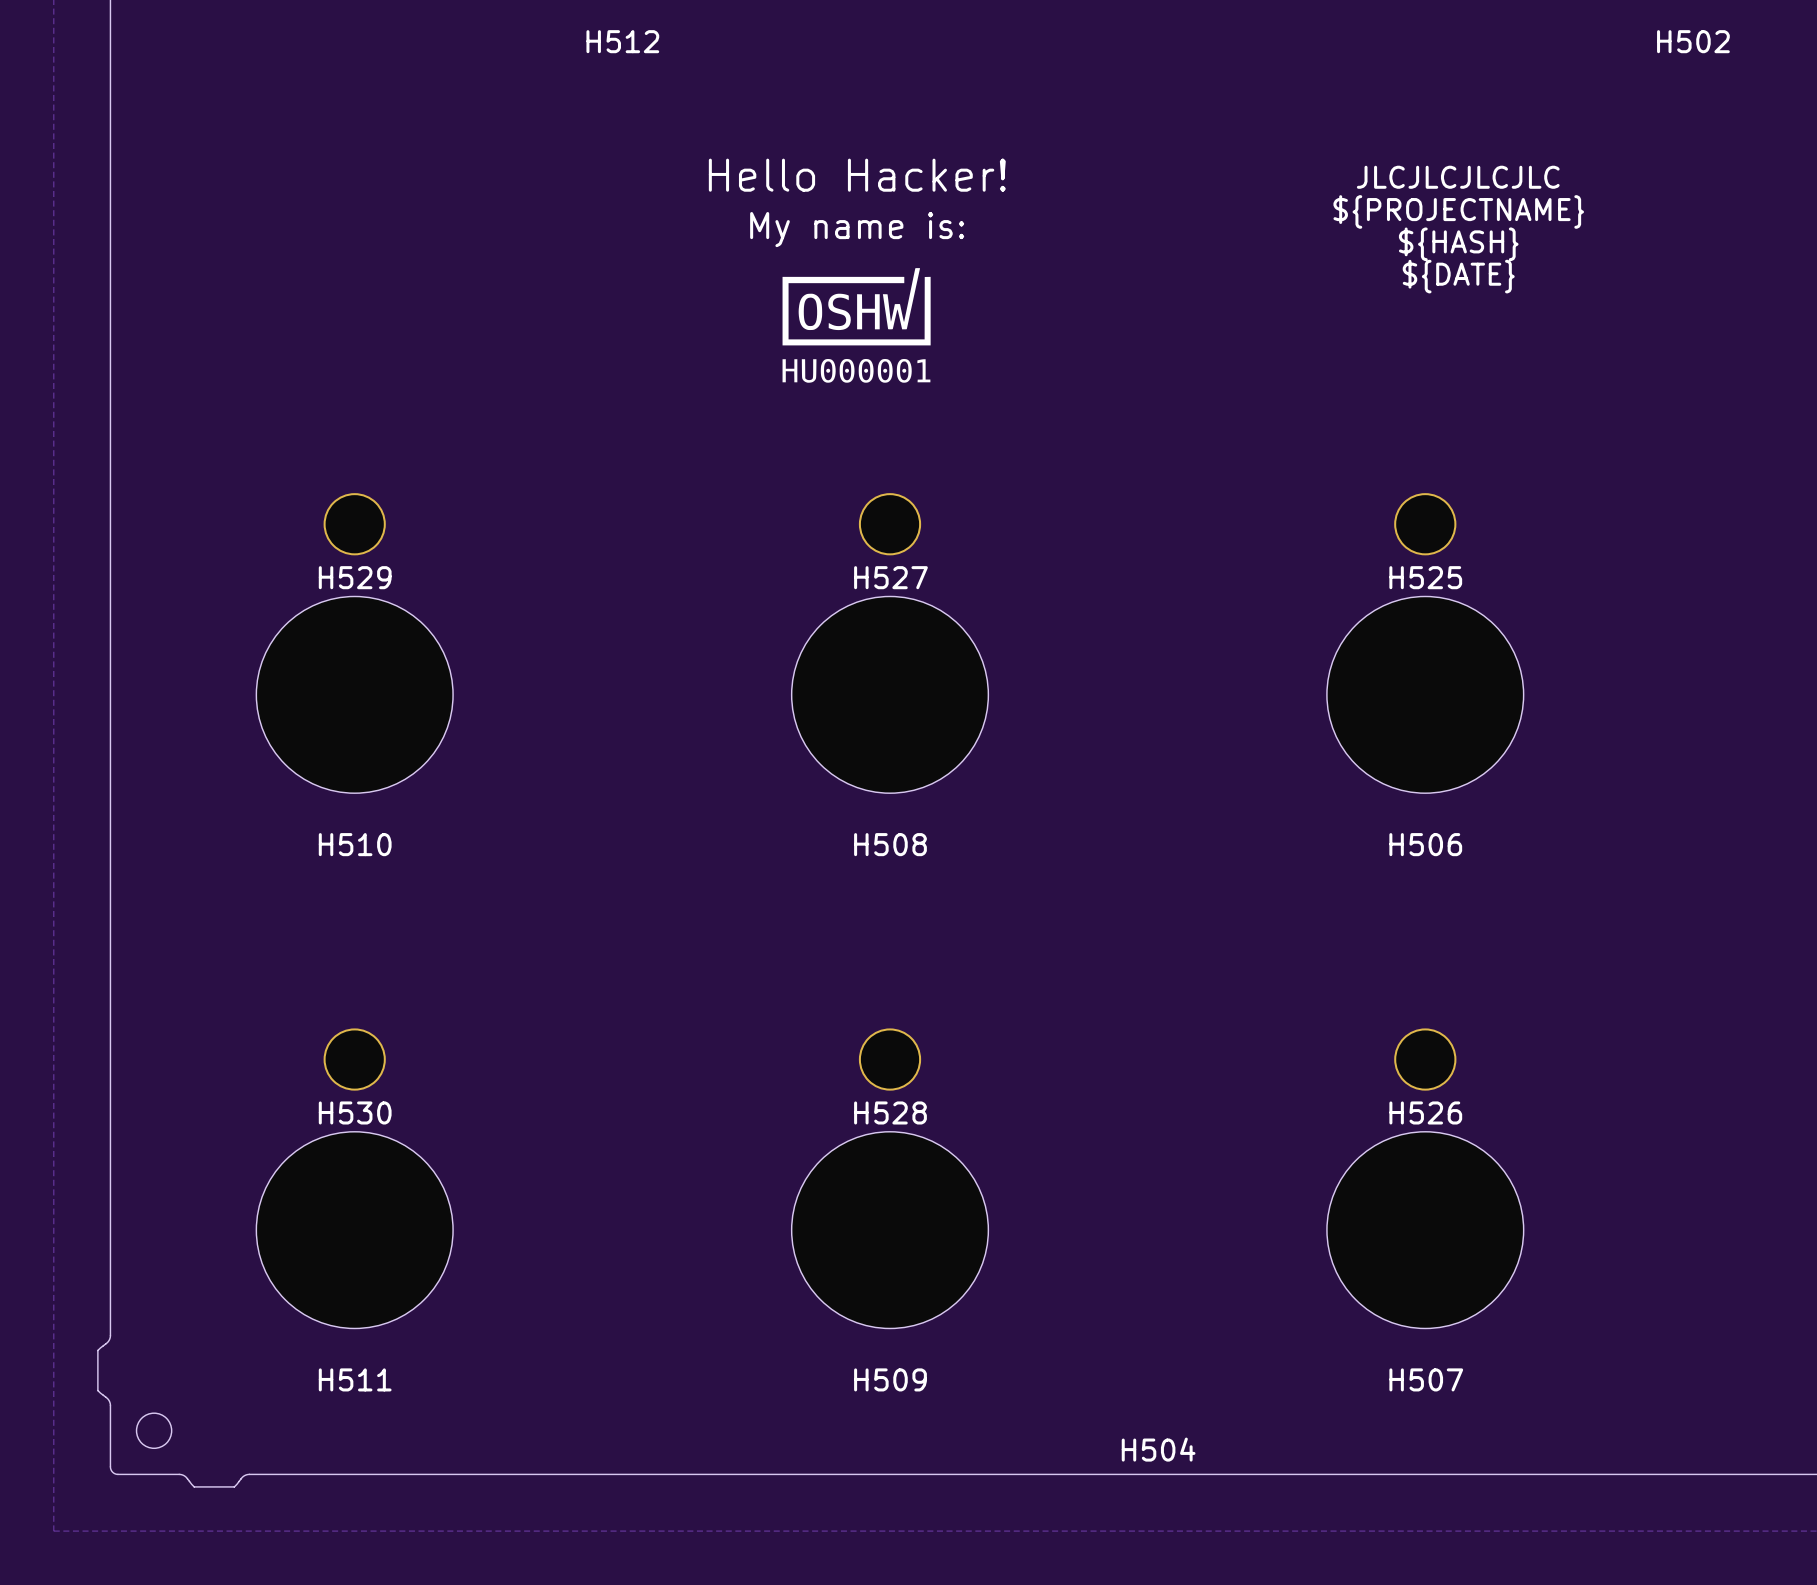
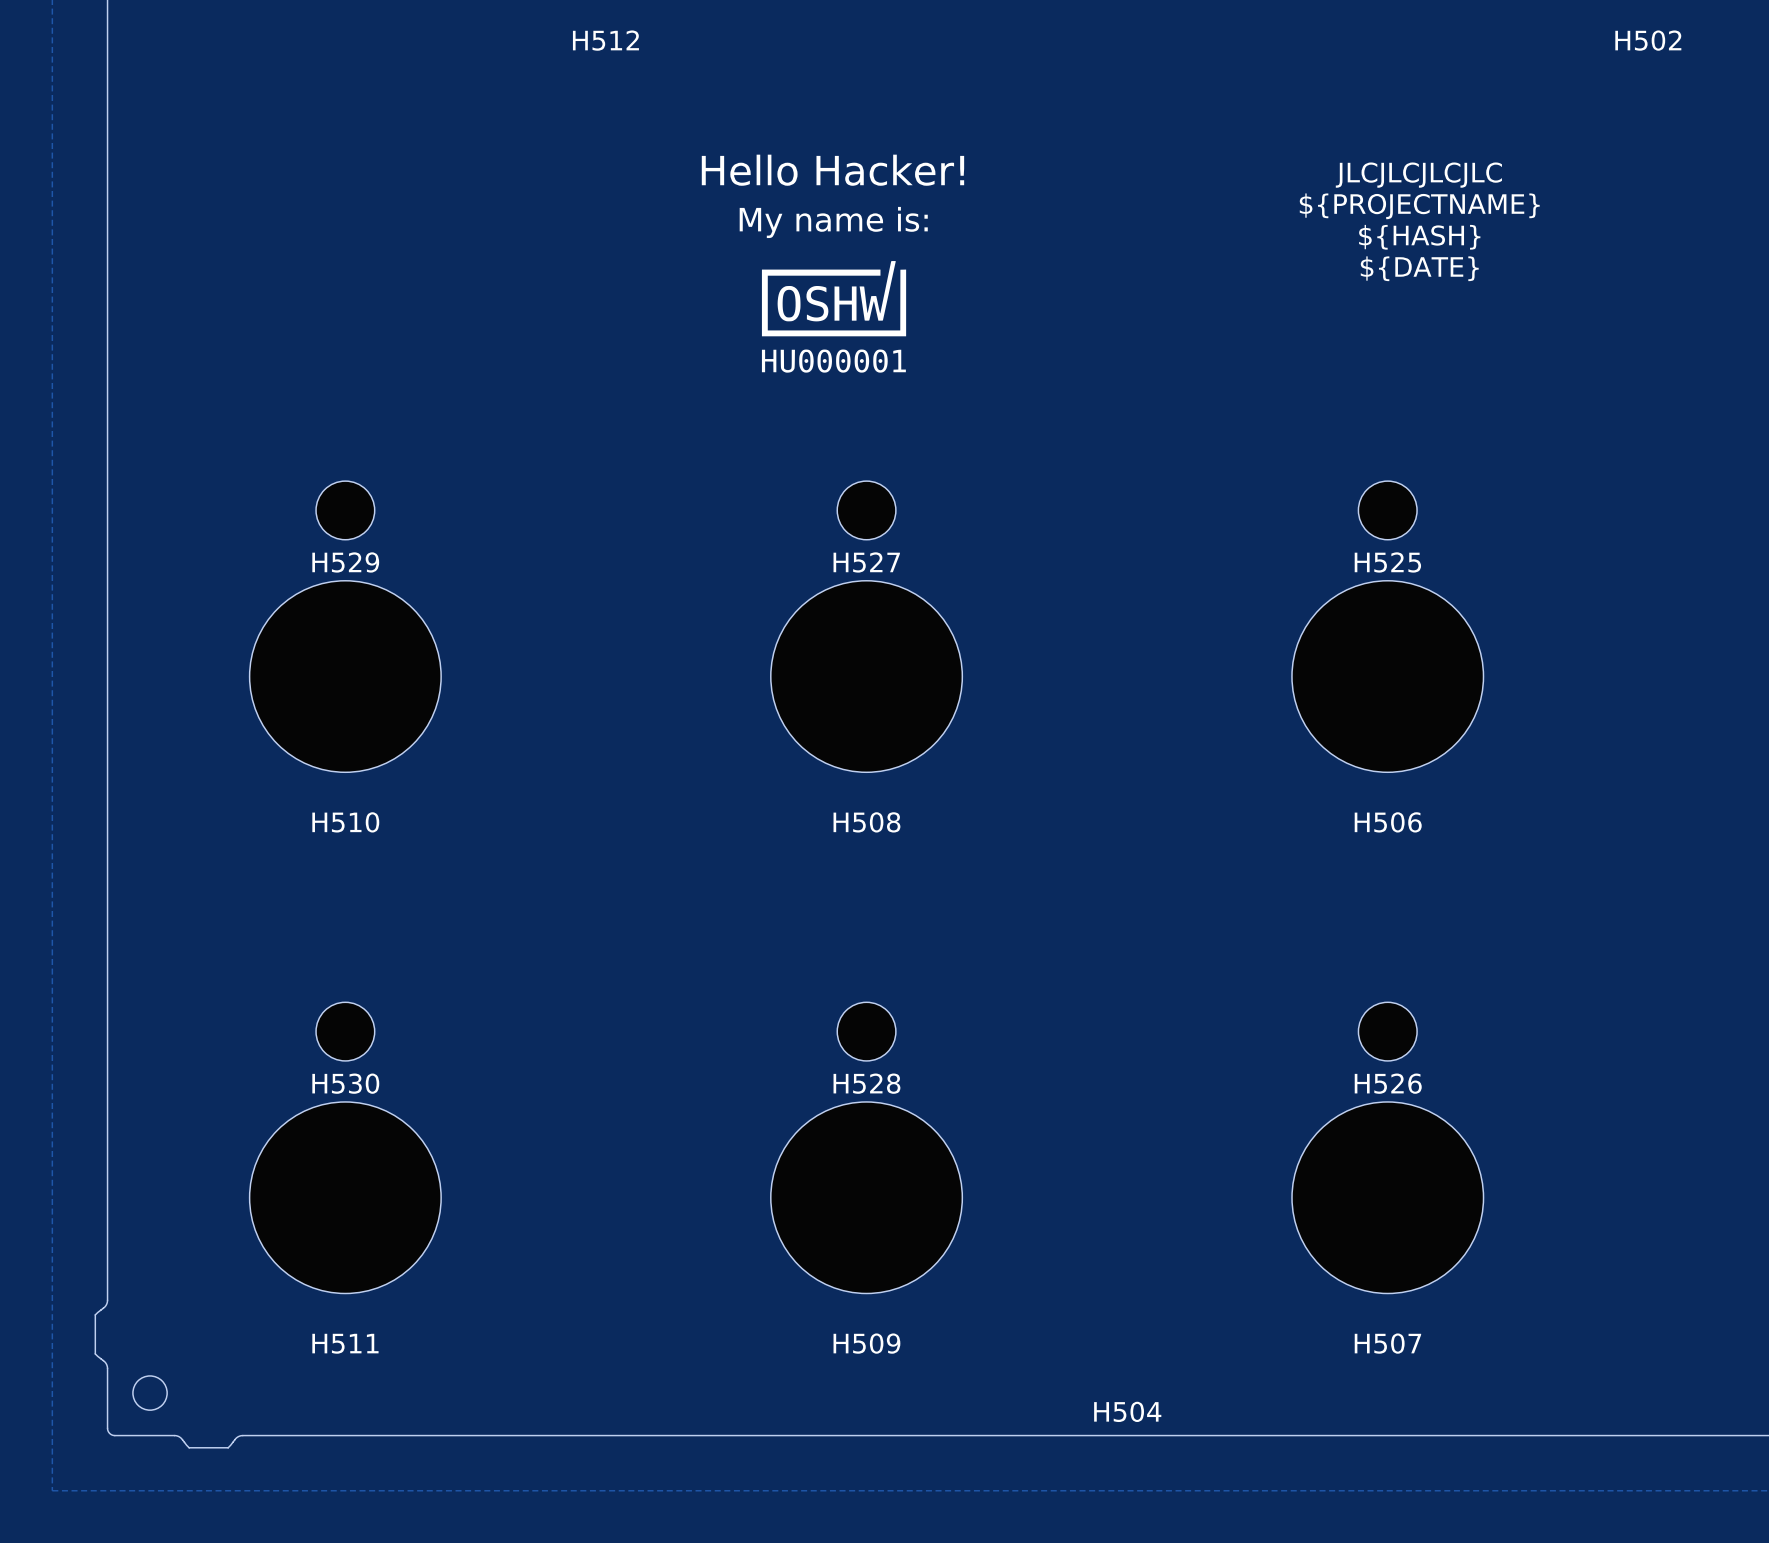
H529 footprint: [323, 493, 386, 556] -> [316, 481, 375, 540]
H527 footprint: [858, 493, 922, 556] -> [837, 481, 896, 540]
H525 footprint: [1394, 493, 1457, 556] -> [1358, 481, 1418, 540]
H530 footprint: [323, 1028, 386, 1091] -> [316, 1002, 375, 1061]
H528 footprint: [858, 1028, 922, 1091] -> [837, 1002, 896, 1061]
H526 footprint: [1394, 1028, 1457, 1091] -> [1358, 1002, 1418, 1061]

